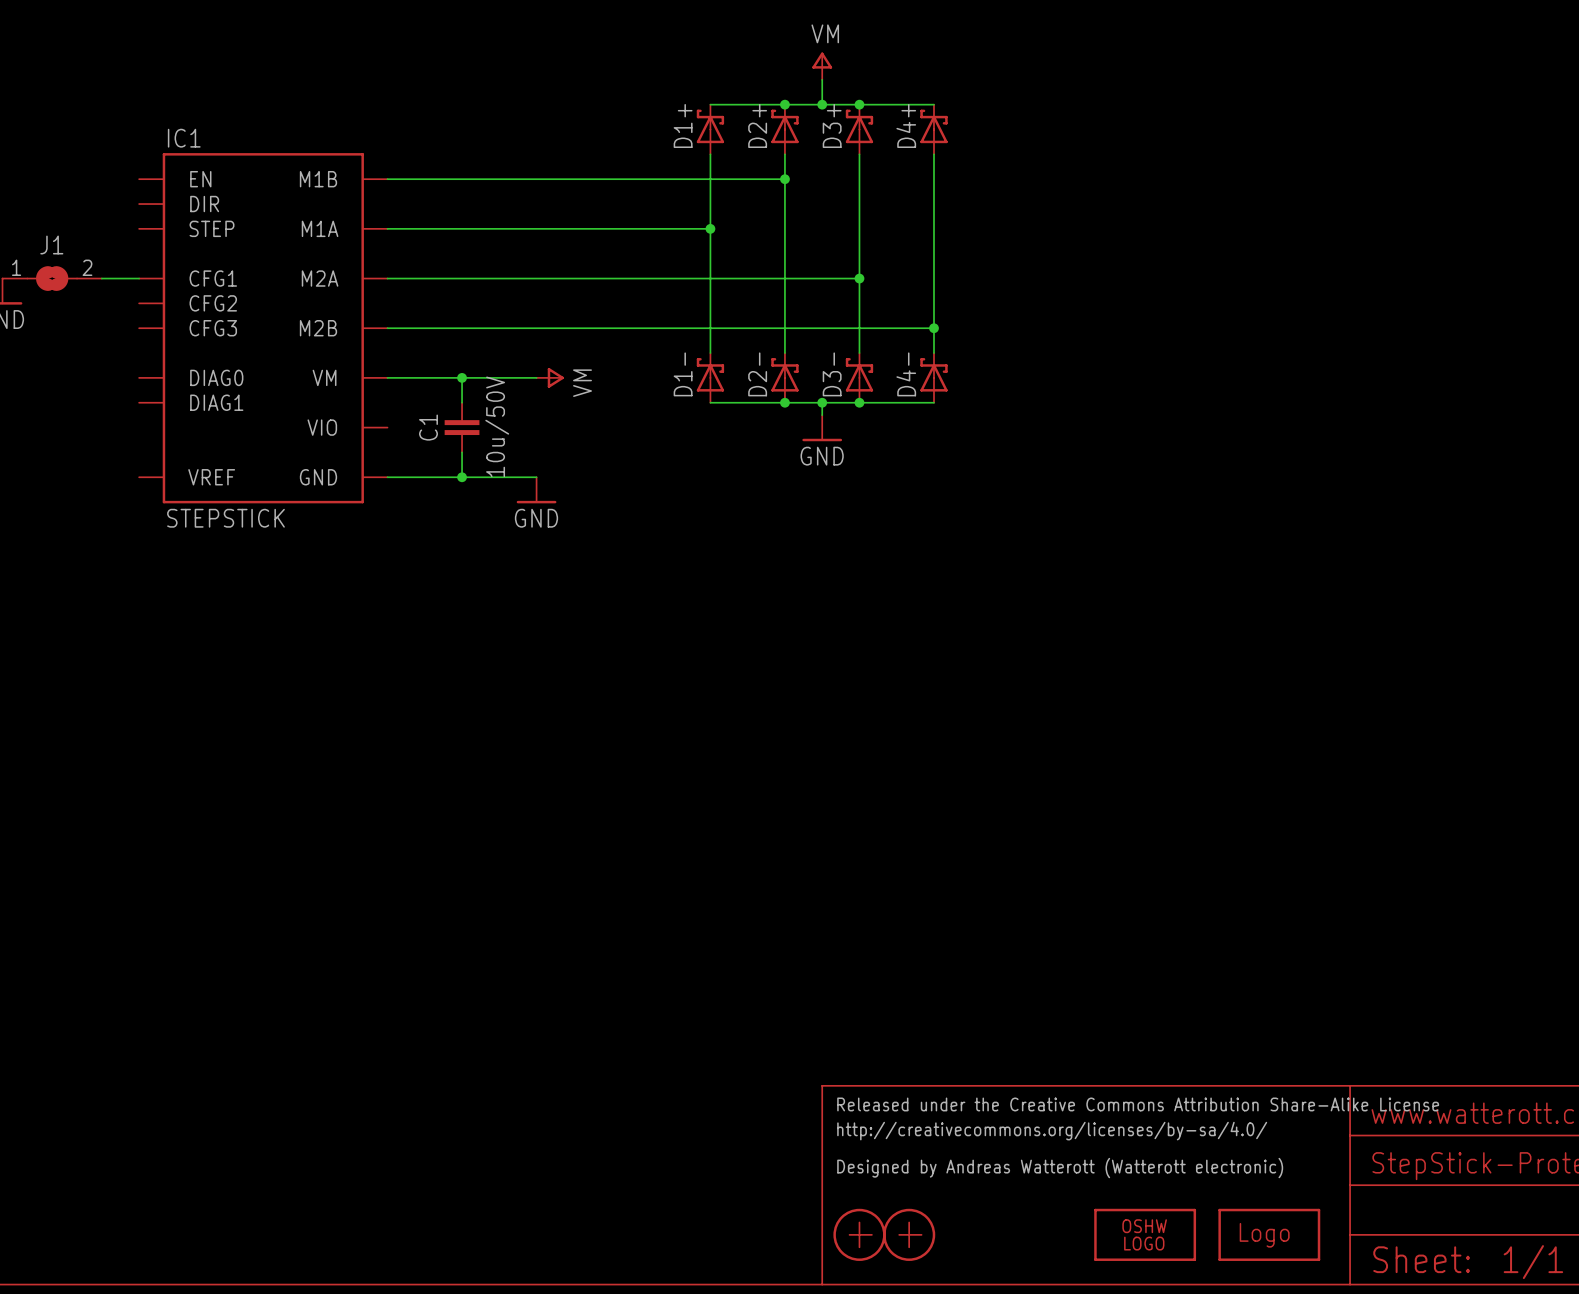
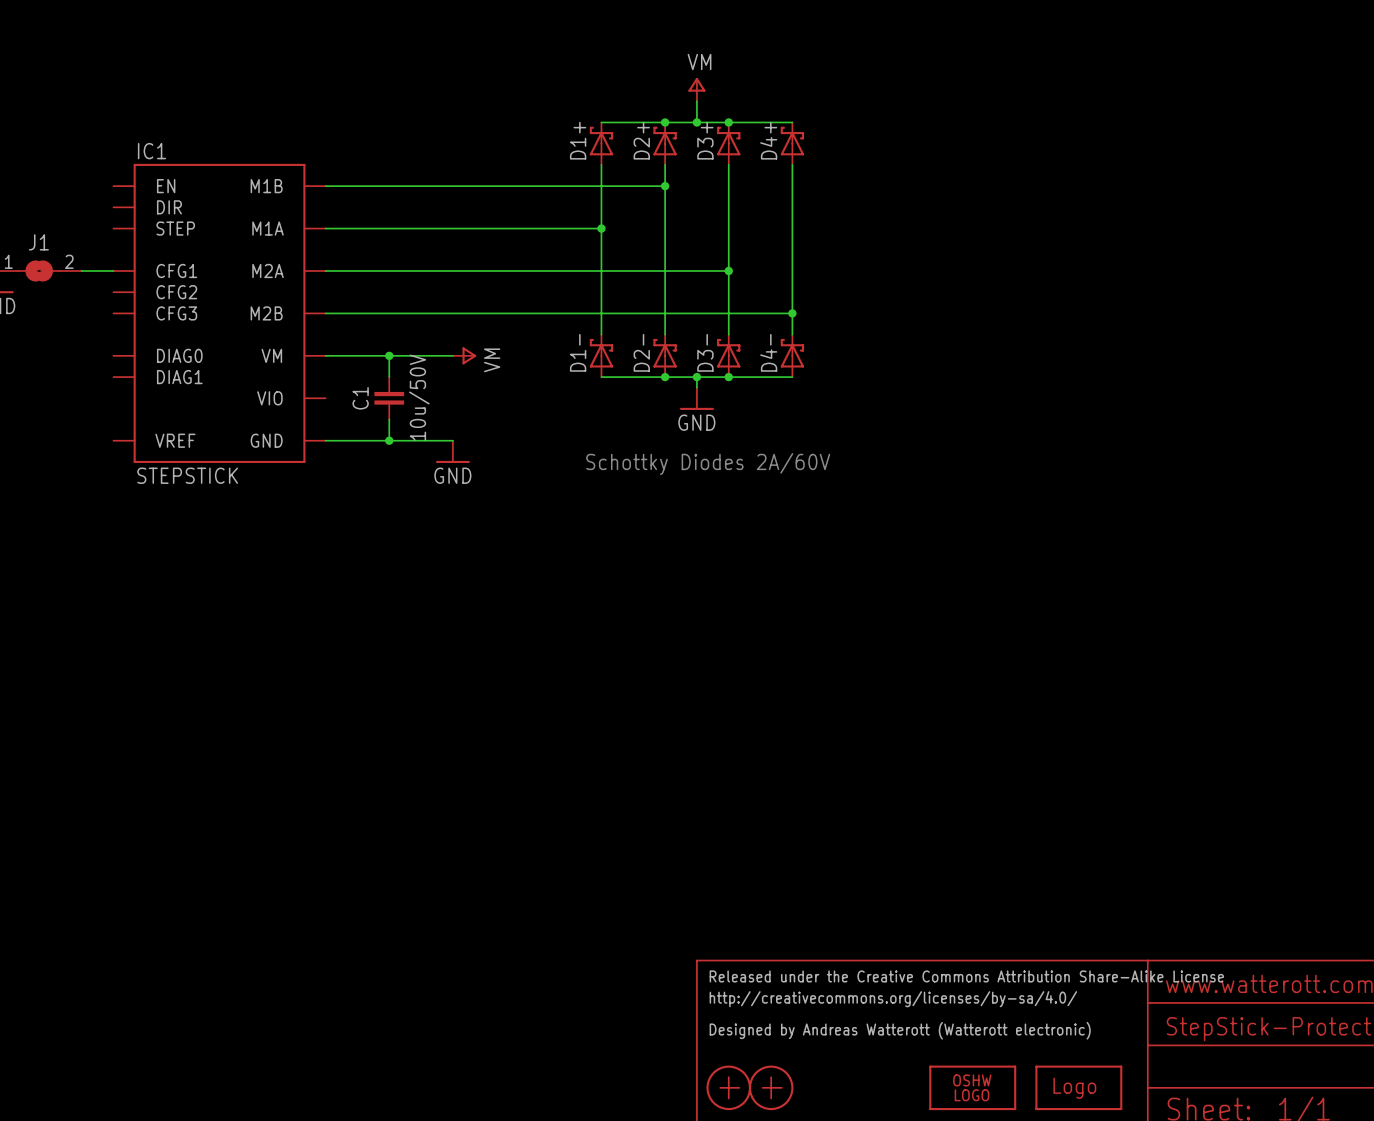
text: none -> Schottky Diodes 2A/60V (708, 464)

